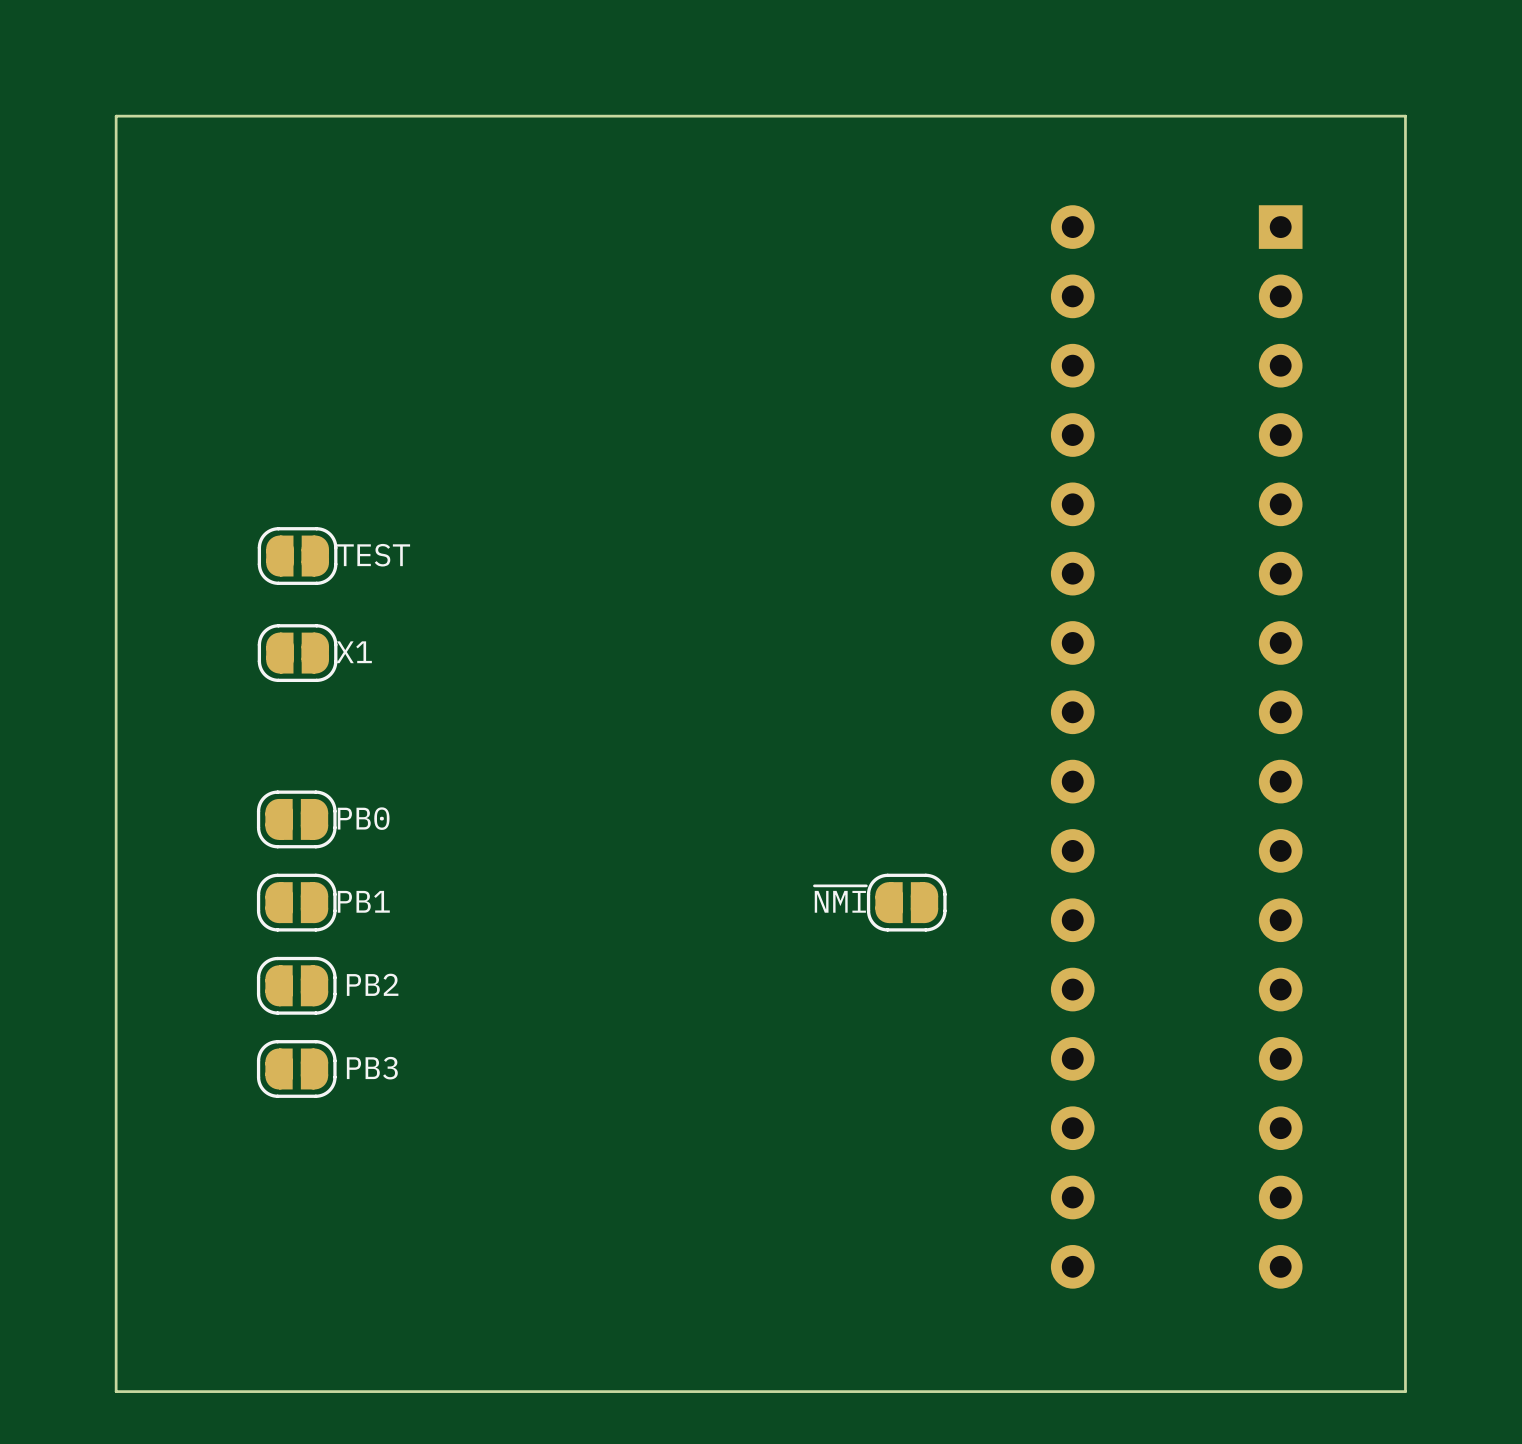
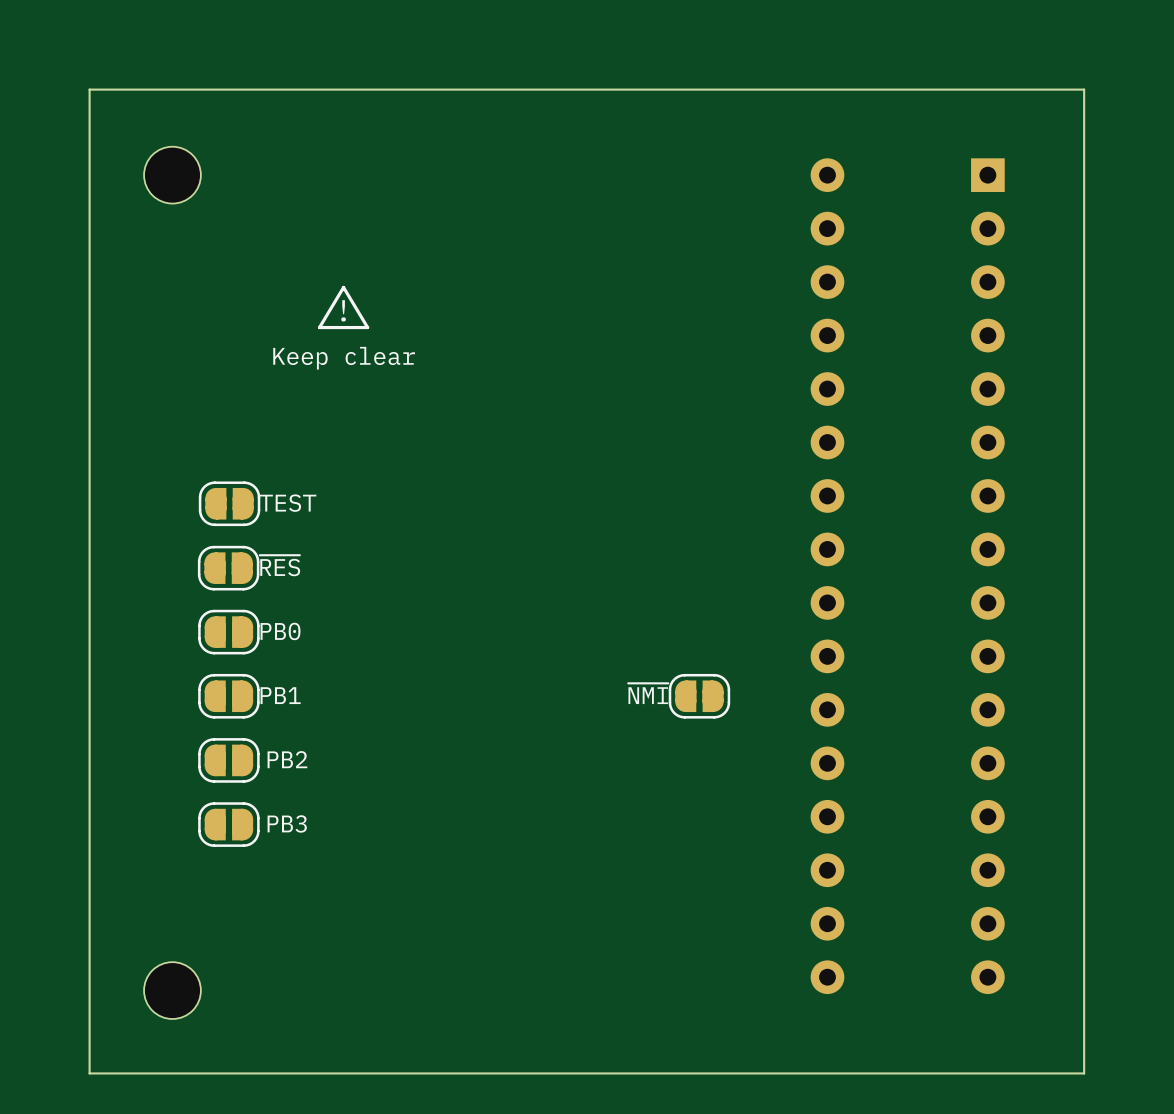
part: none -> (172, 175)
line: none -> (343, 287) (319, 327) (367, 327) (343, 287)
text: none -> ! (343, 310)
text: none -> Keep clear (344, 358)
part: TEST (297, 556) -> none
part value: X1 (354, 652) -> TEST (287, 503)
part: none -> ~{RES} (228, 568)
part: none -> (172, 990)

